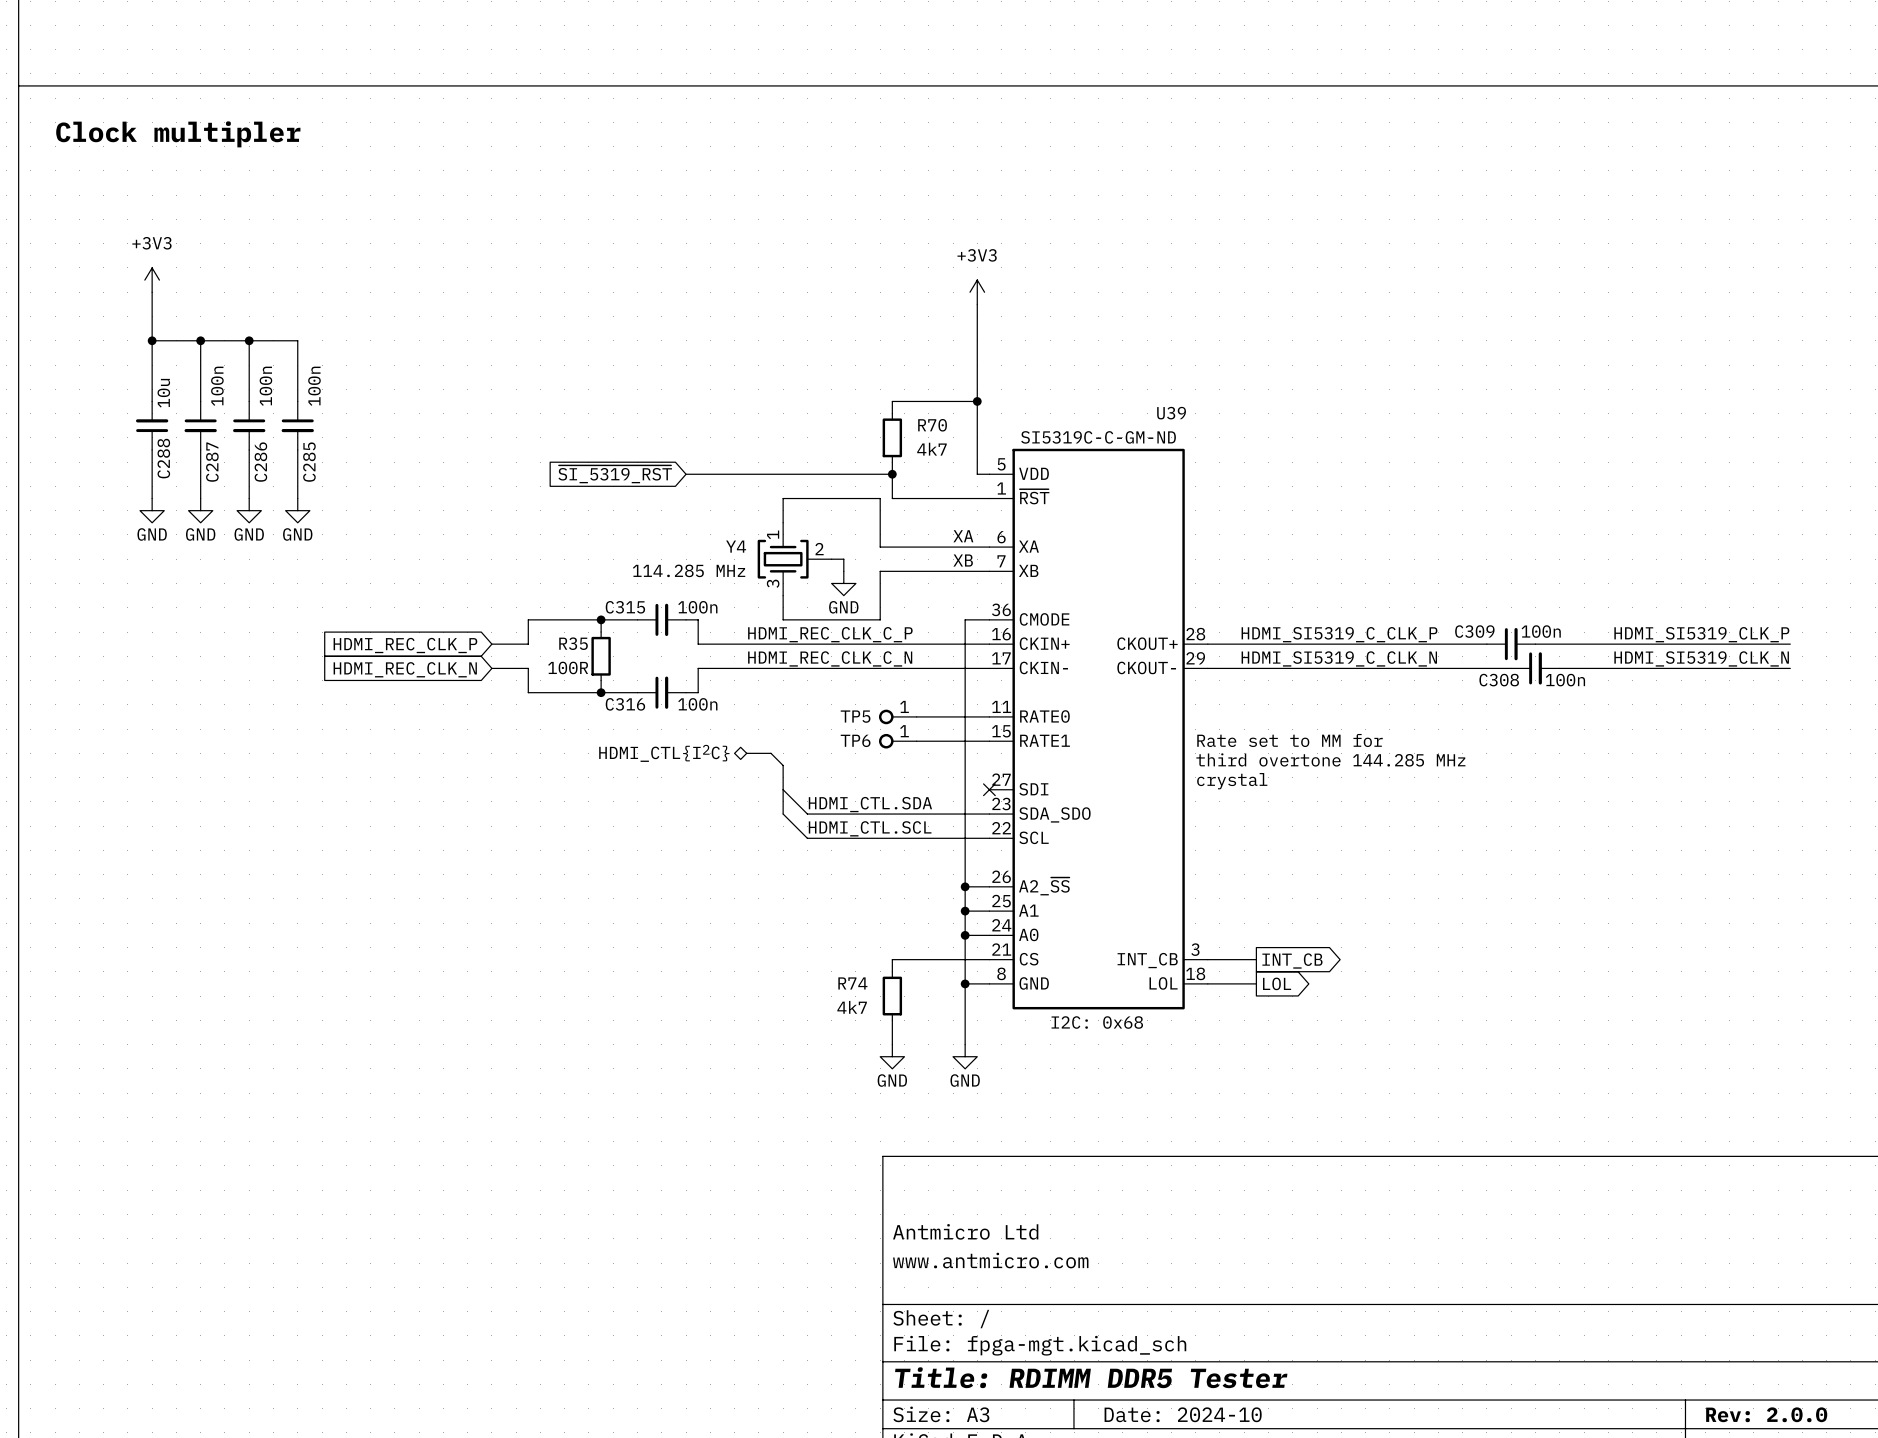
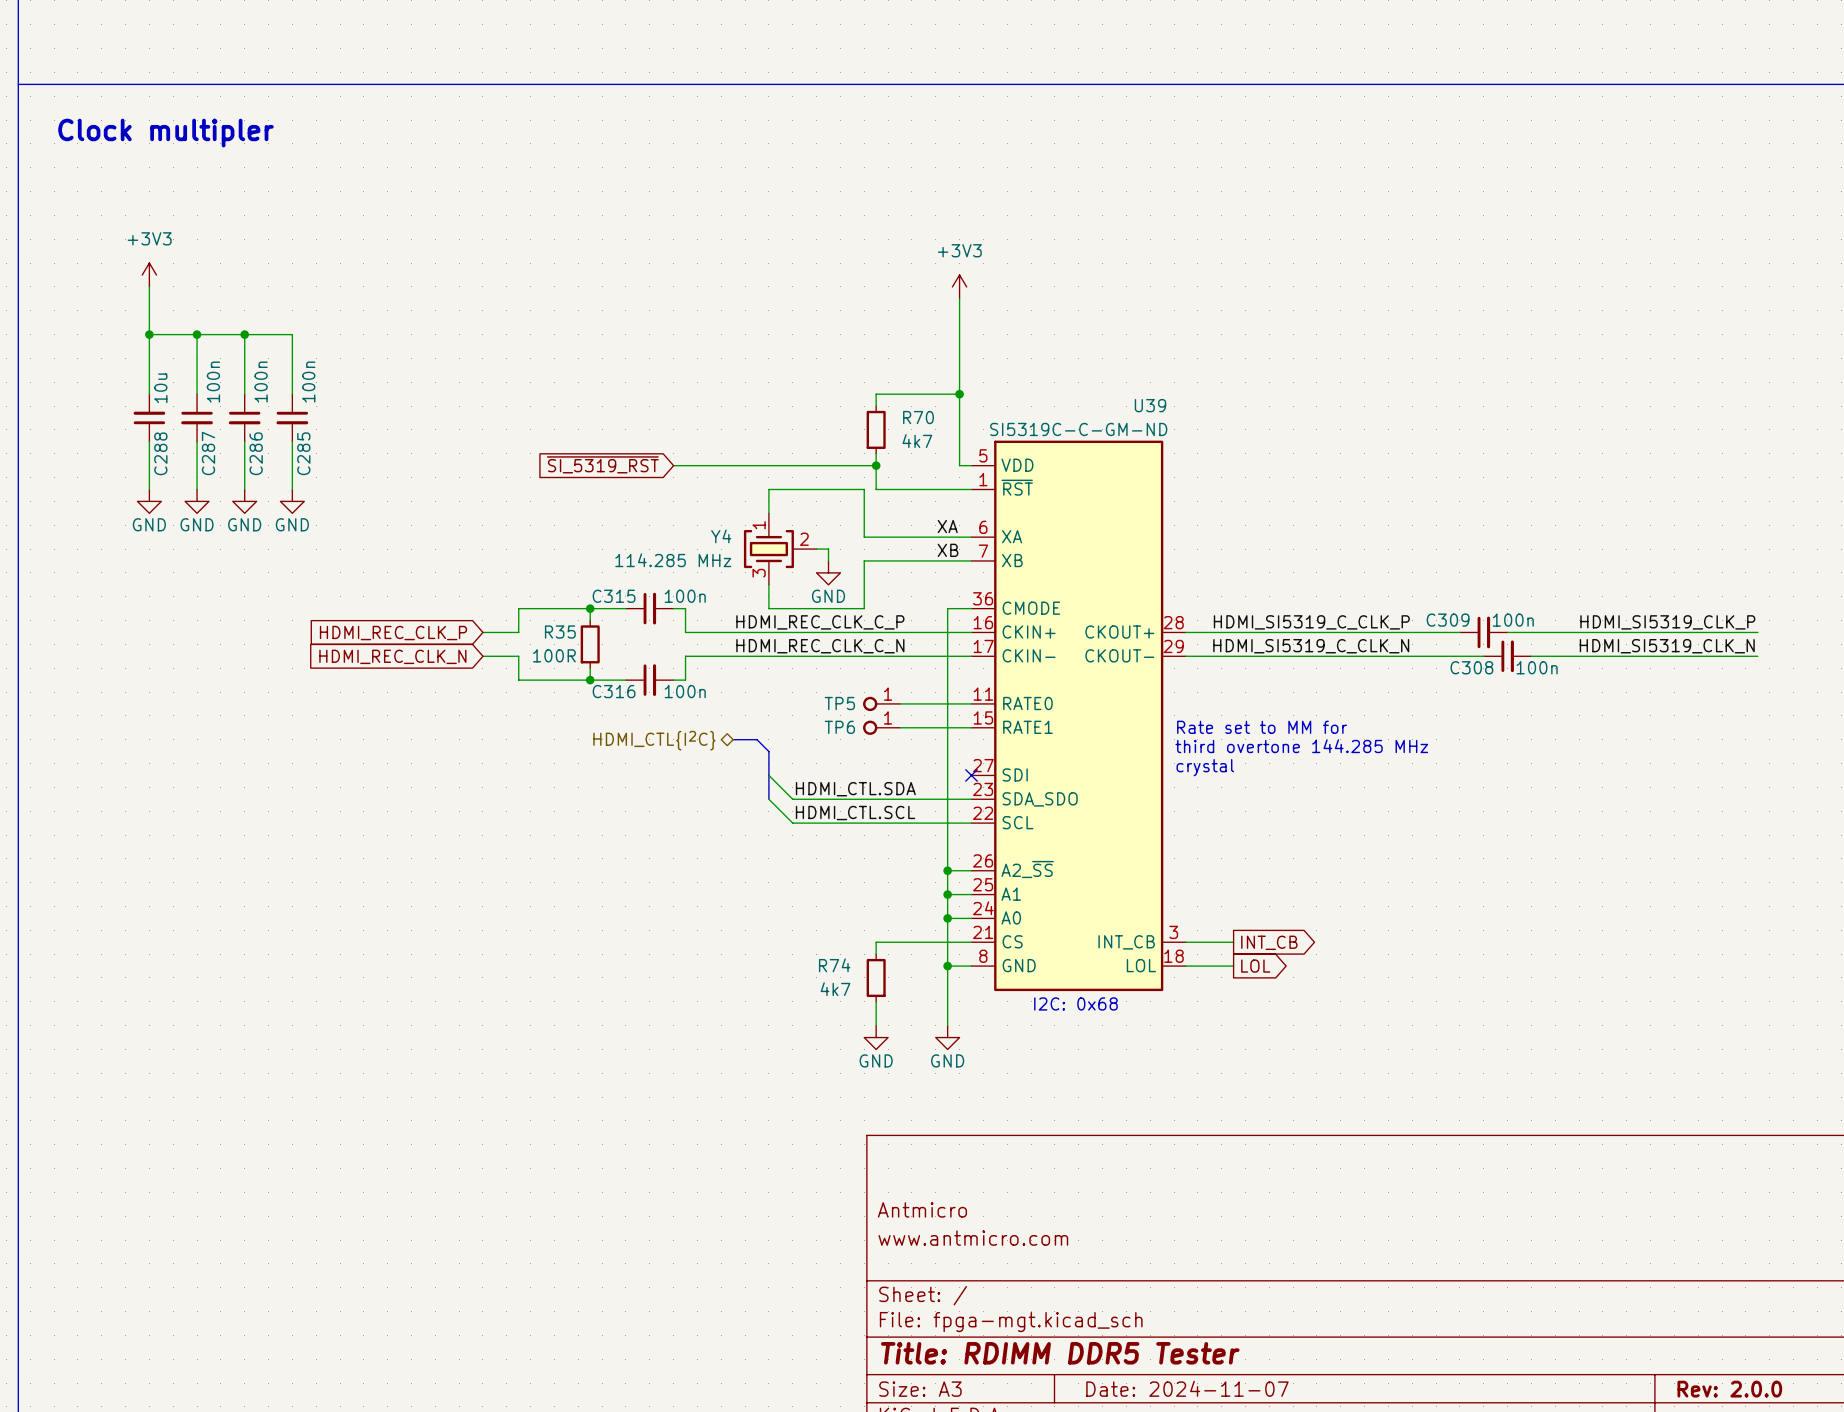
title block: Antmicro Ltd (965, 1231) -> Antmicro (922, 1209)
title block: Date: 2024-10 (1183, 1414) -> Date: 2024-11-07 (1187, 1388)

